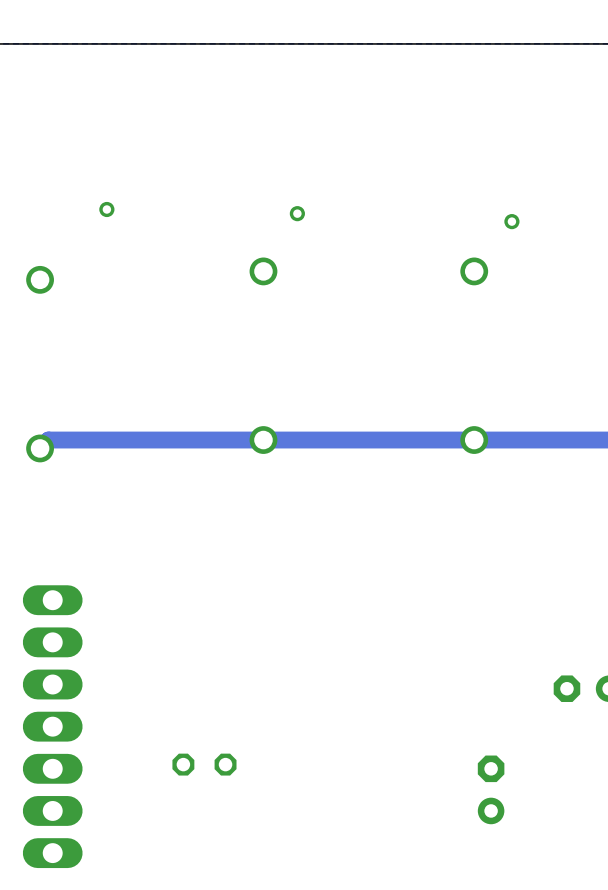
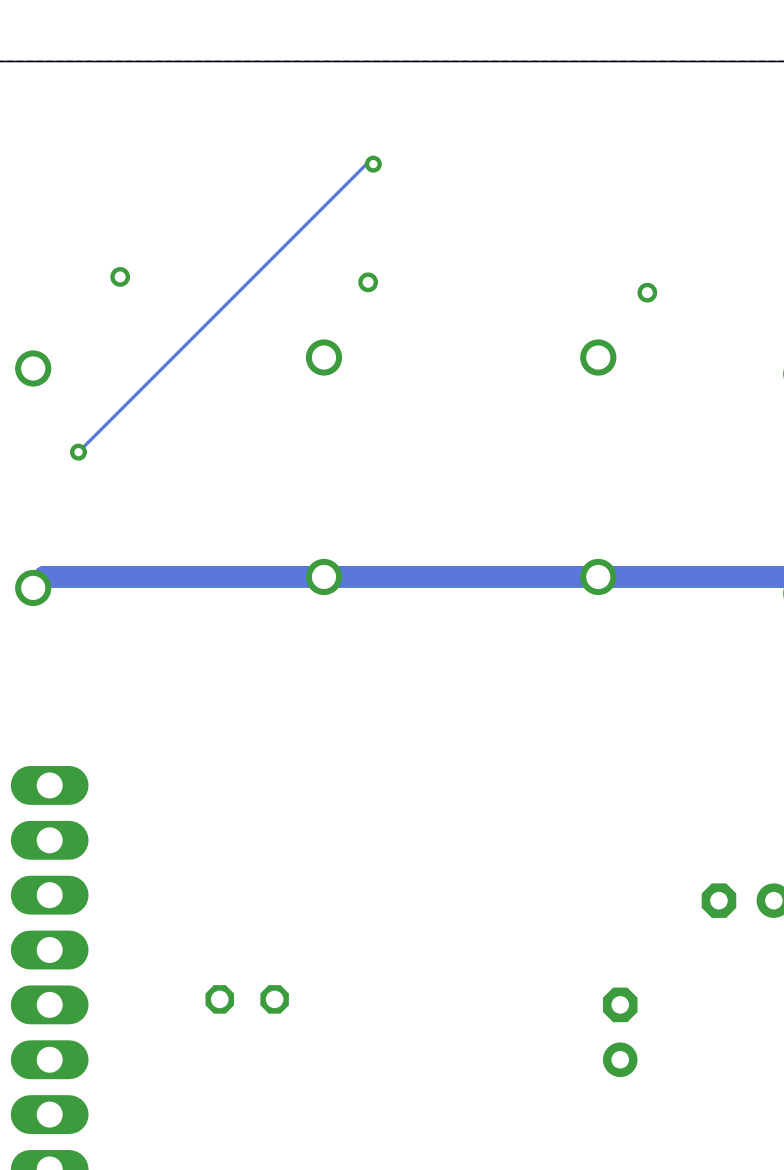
track: none -> (373, 164) (366, 164) (78, 452)
via: none -> (373, 164)
via: none -> (78, 452)

